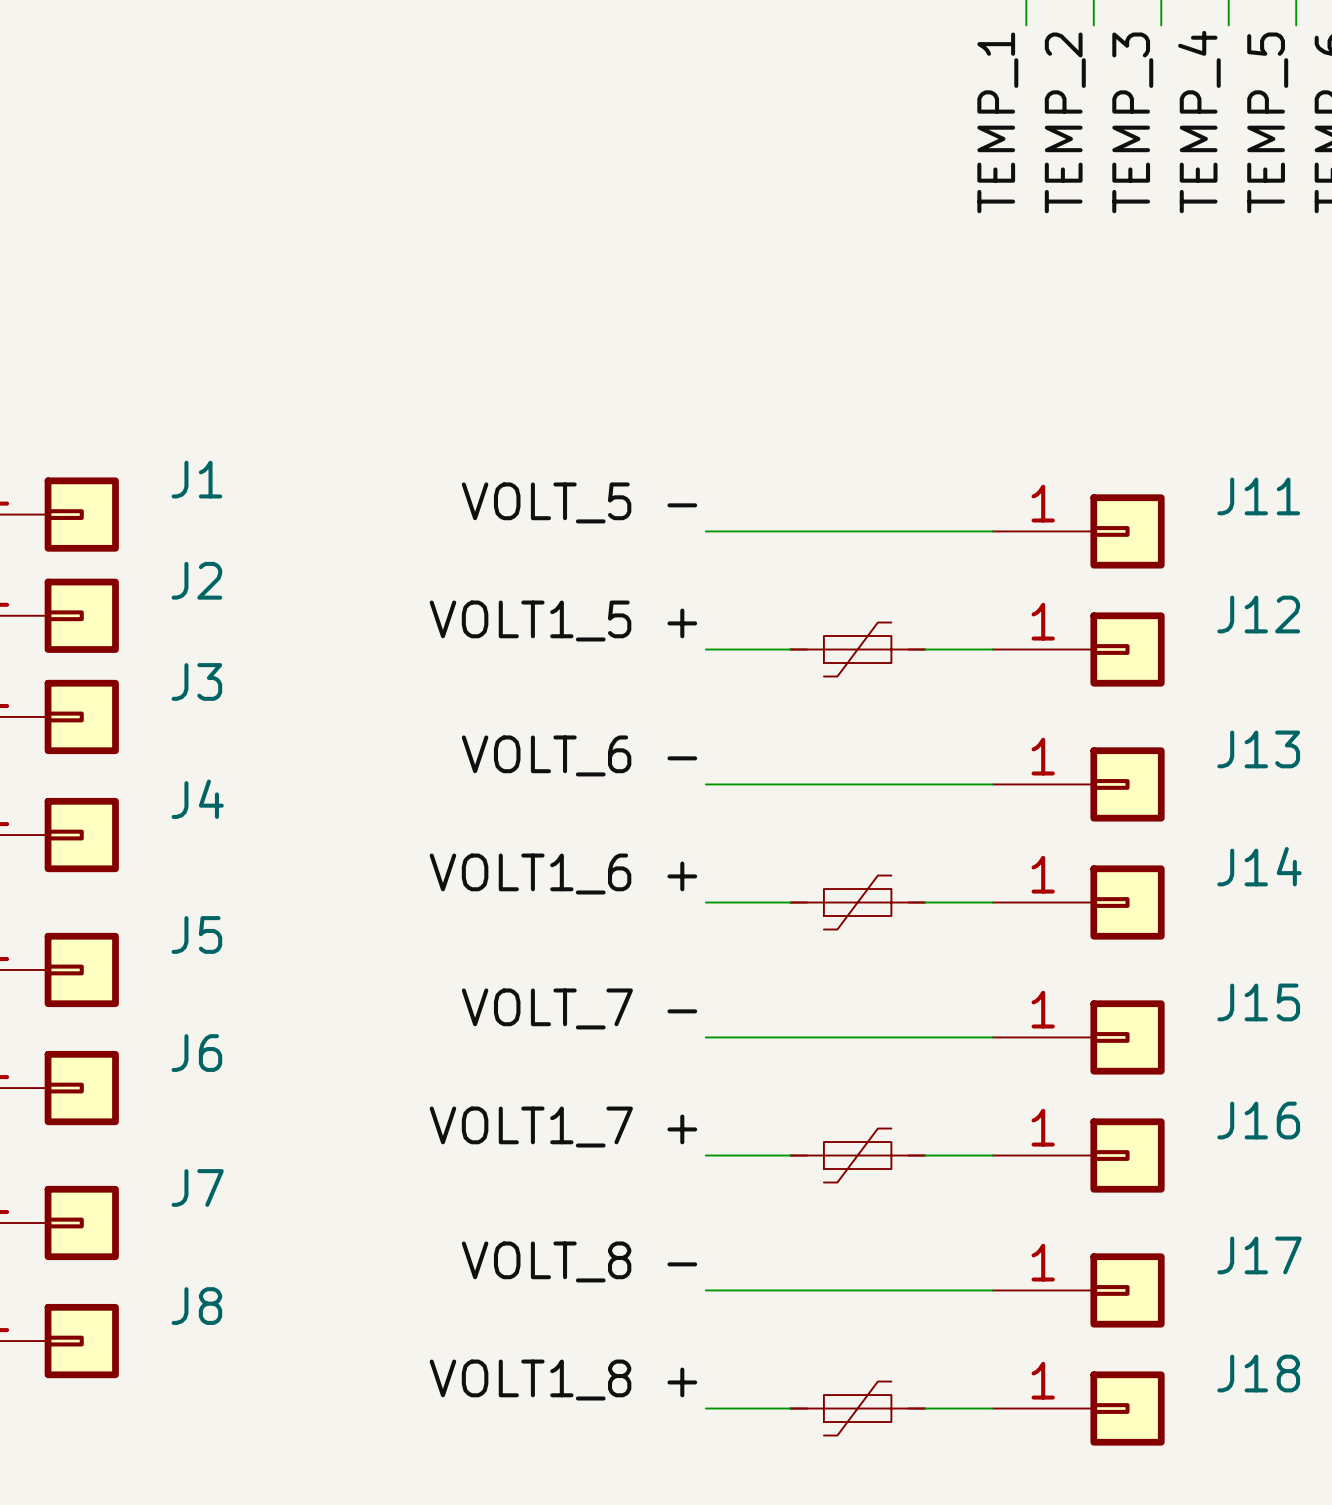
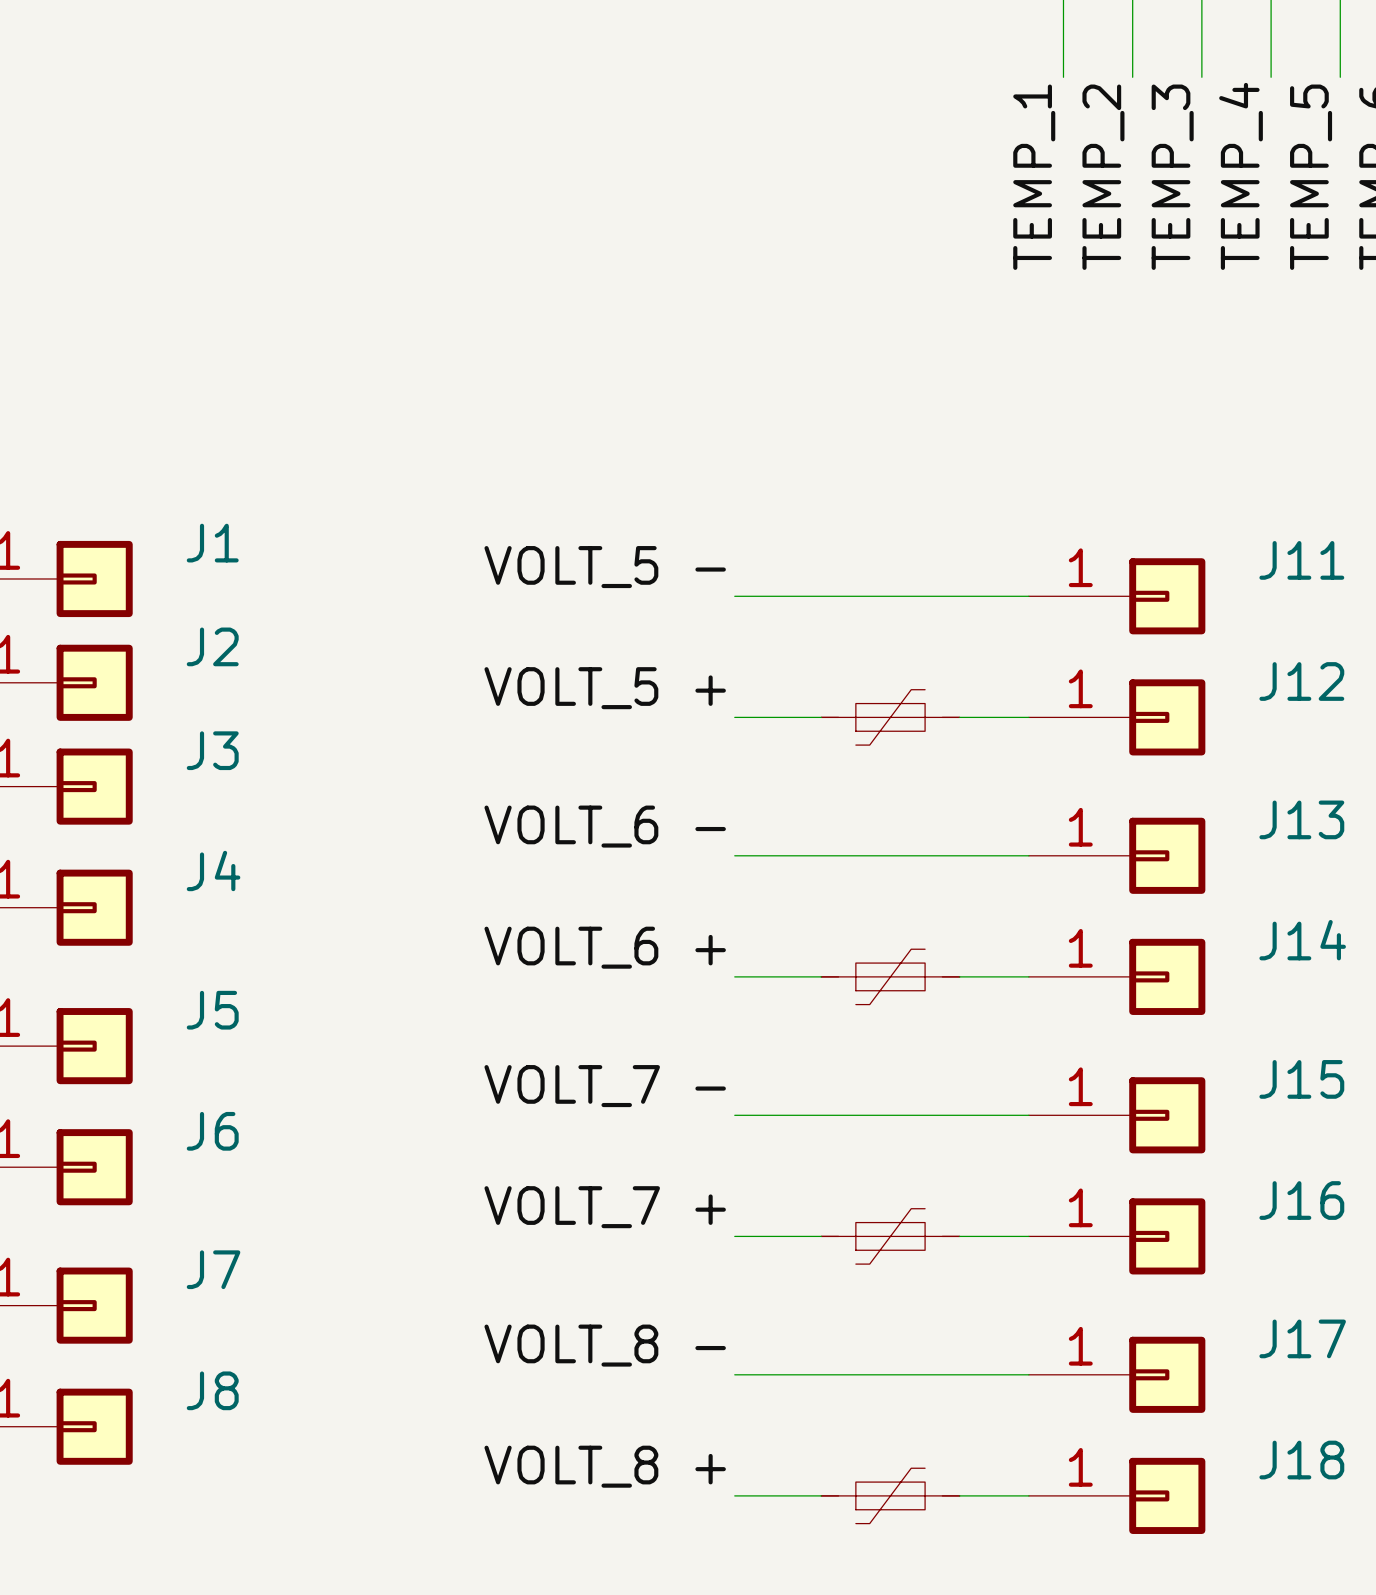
label: VOLT1_5 + (563, 621) -> VOLT_5 + (605, 688)
label: VOLT1_6 + (563, 874) -> VOLT_6 + (605, 947)
label: VOLT1_7 + (563, 1127) -> VOLT_7 + (605, 1207)
label: VOLT1_8 + (563, 1380) -> VOLT_8 + (605, 1466)

